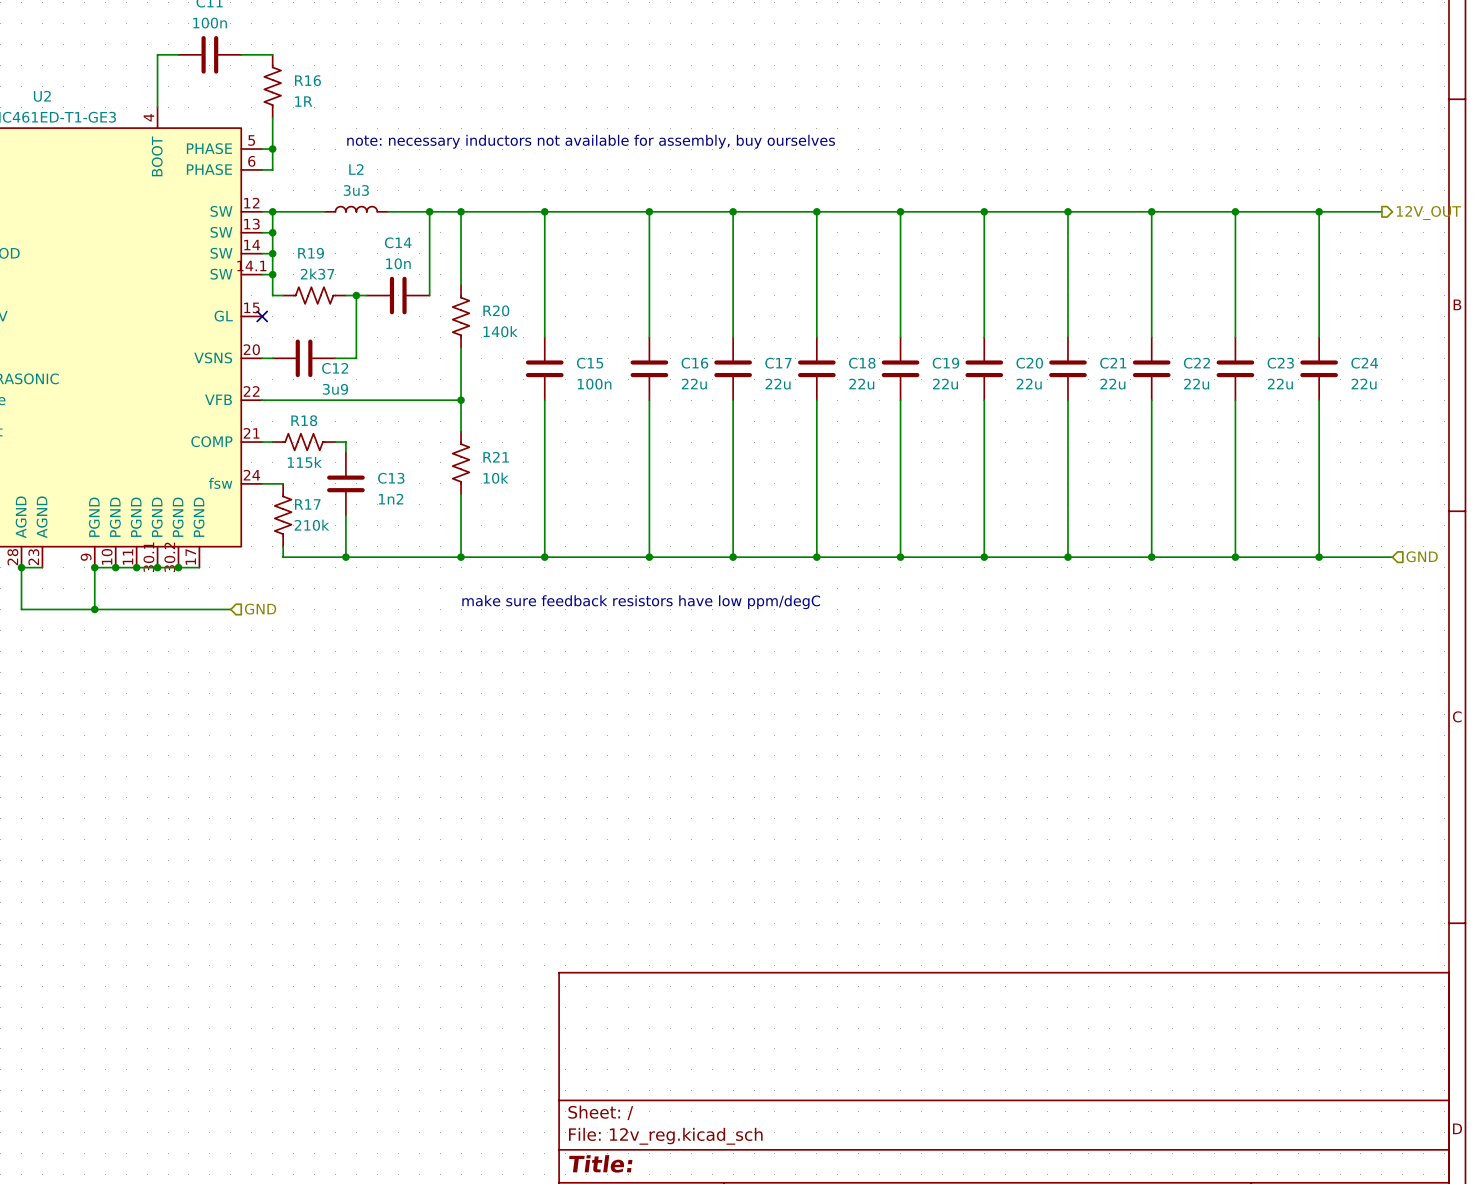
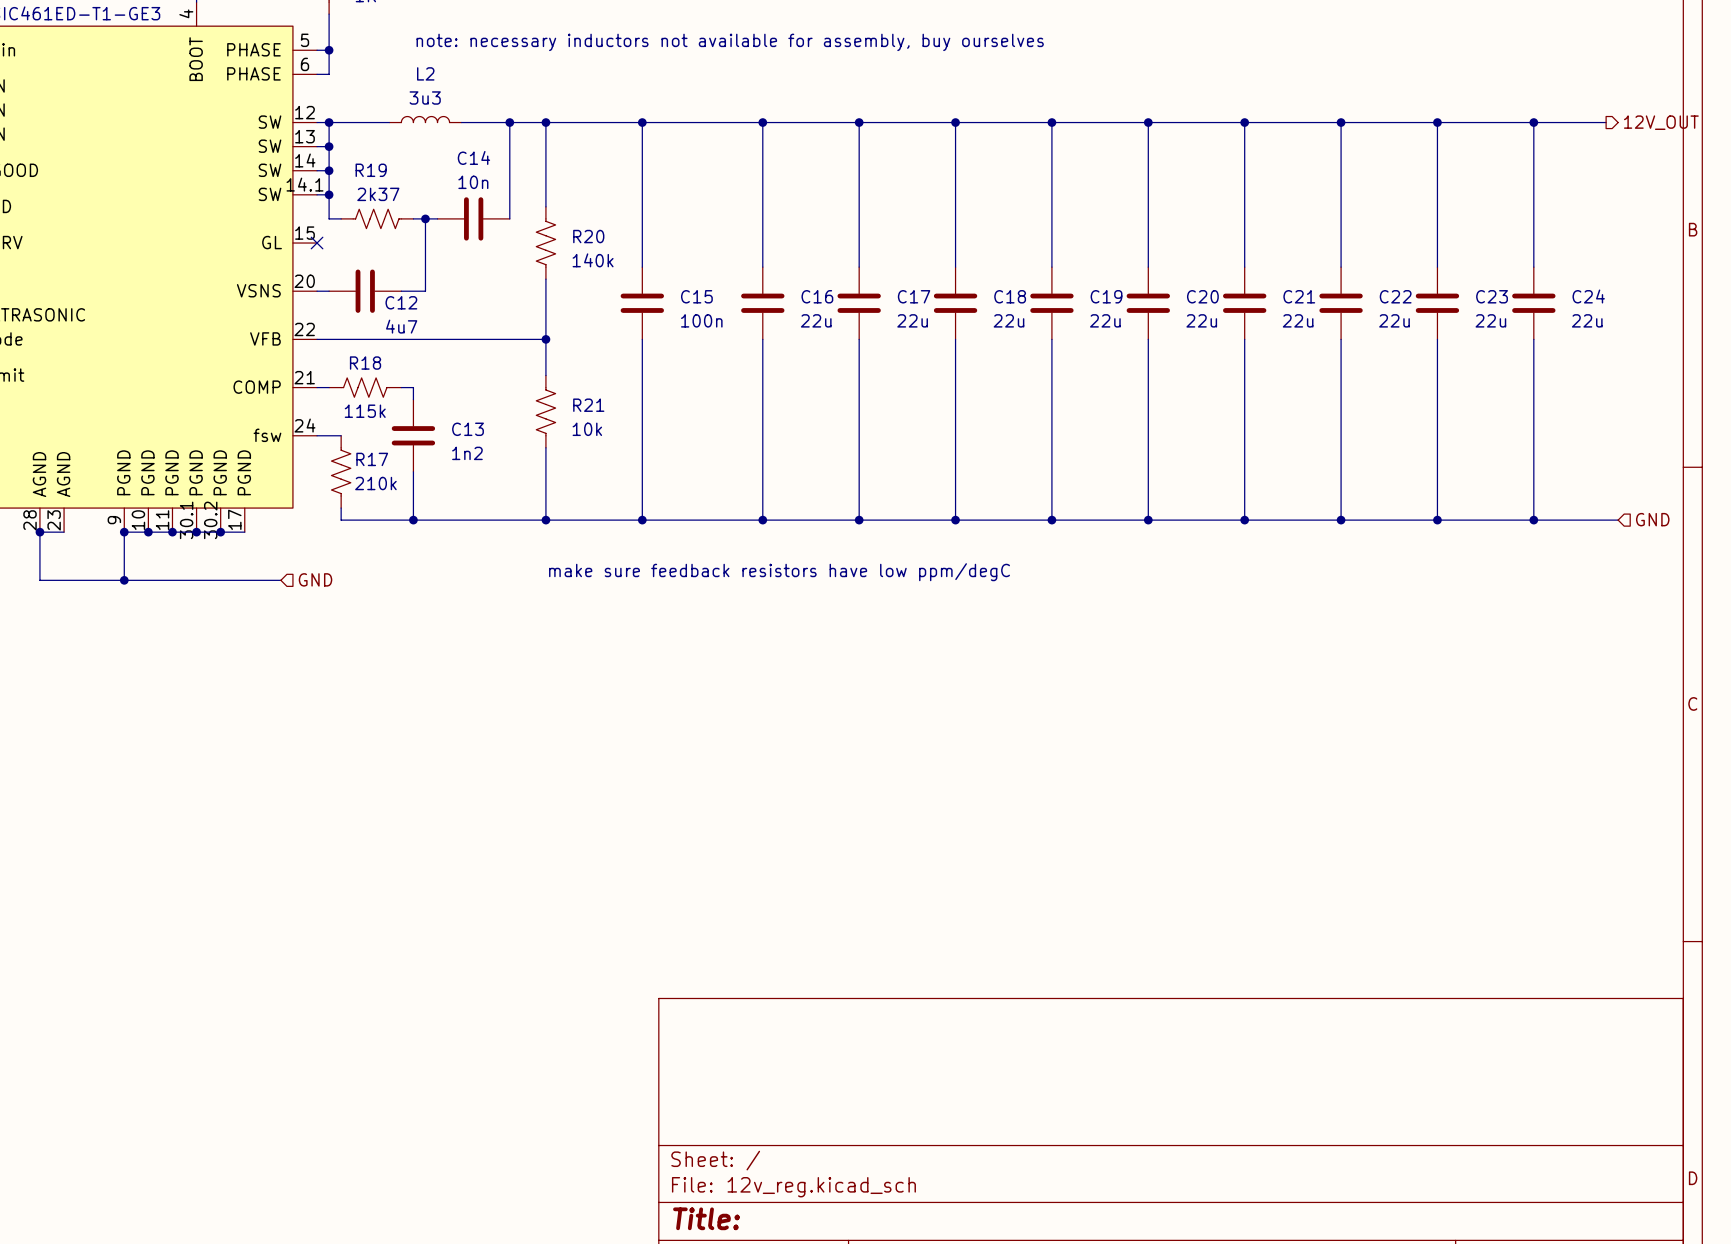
C12 value: 3u9 (335, 389) -> 4u7 (401, 326)

